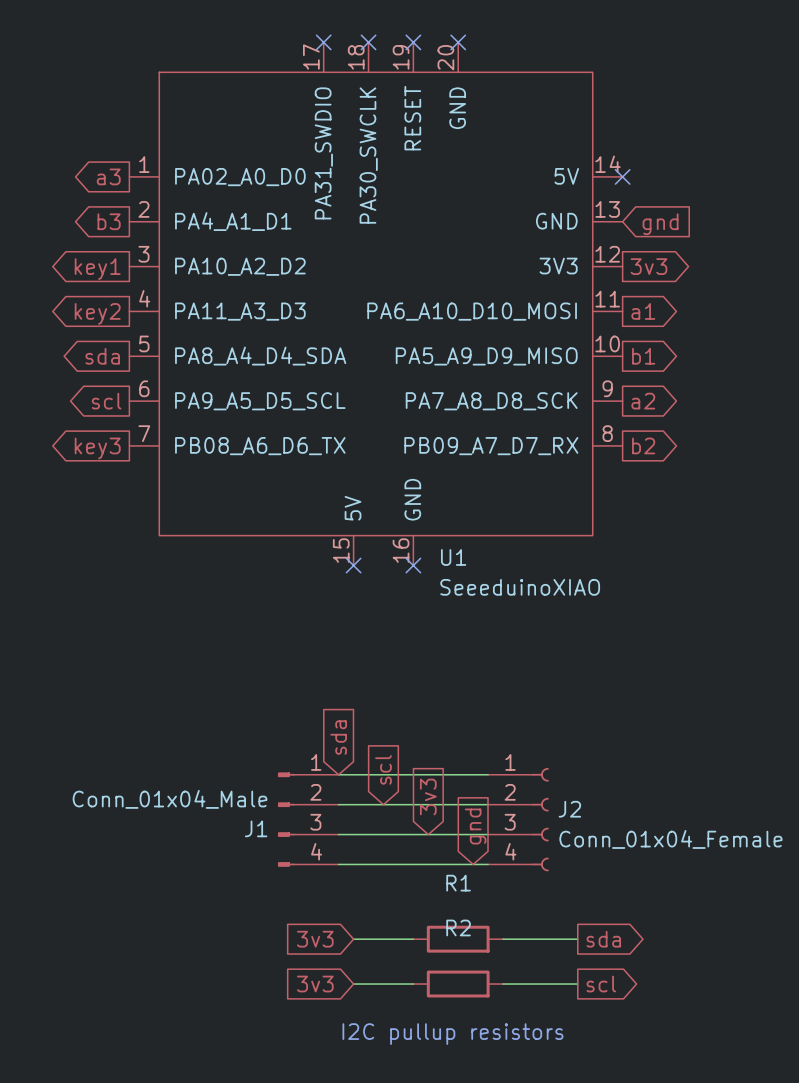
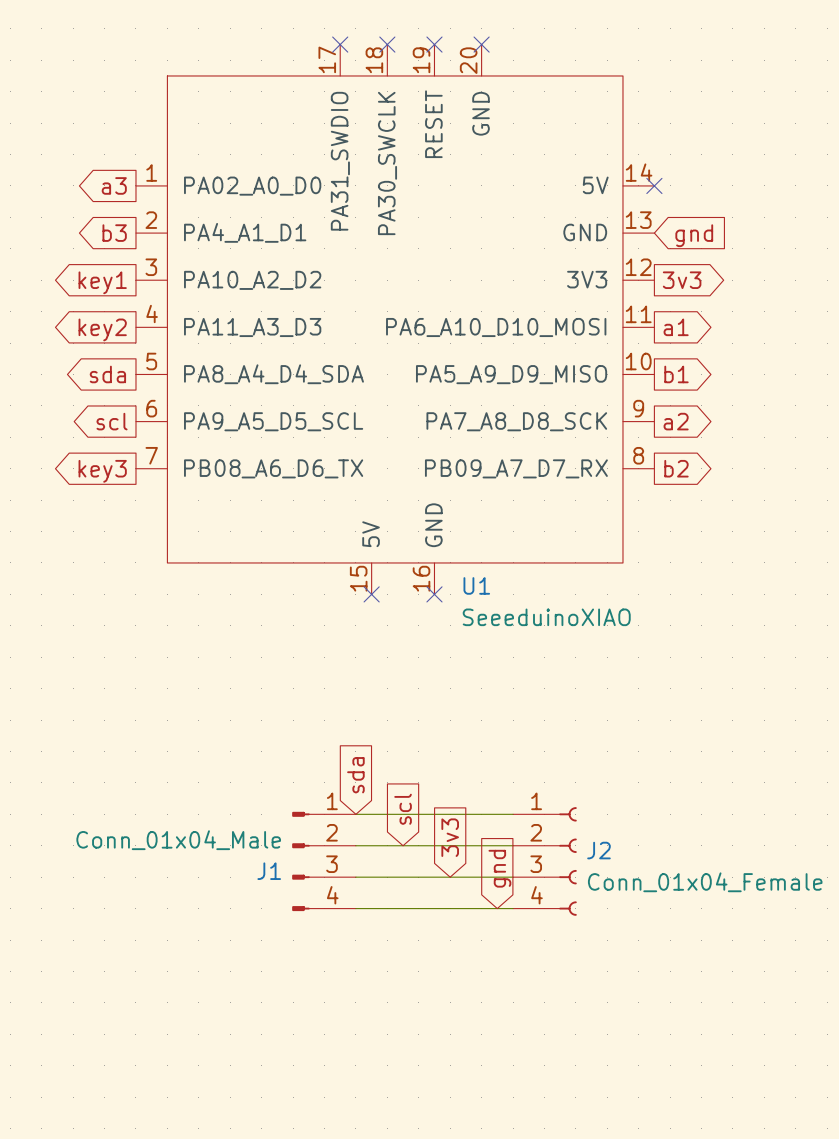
global label: 3v3 (315, 939) -> none
wire: (353, 939) (413, 939) -> none
R1: (458, 939) -> none
wire: (503, 939) (577, 939) -> none
global label: sda (603, 939) -> none
global label: 3v3 (315, 984) -> none
wire: (353, 984) (413, 984) -> none
R2: (458, 984) -> none
wire: (503, 984) (577, 984) -> none
global label: scl (601, 984) -> none
text: I2C pullup resistors (452, 1034) -> none

